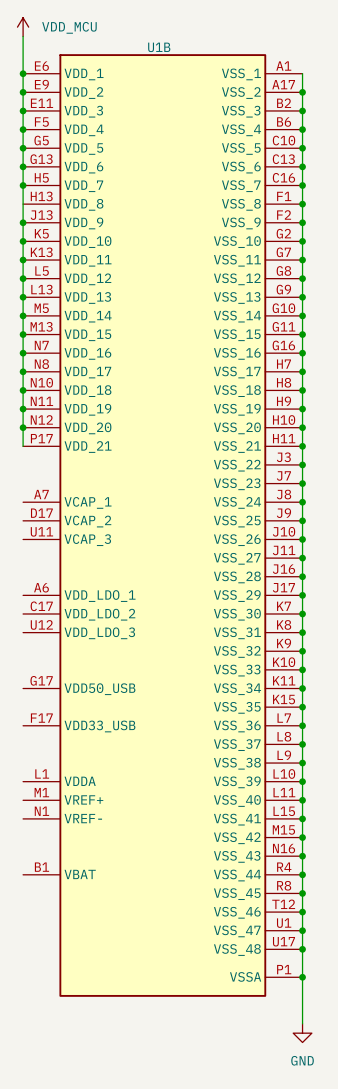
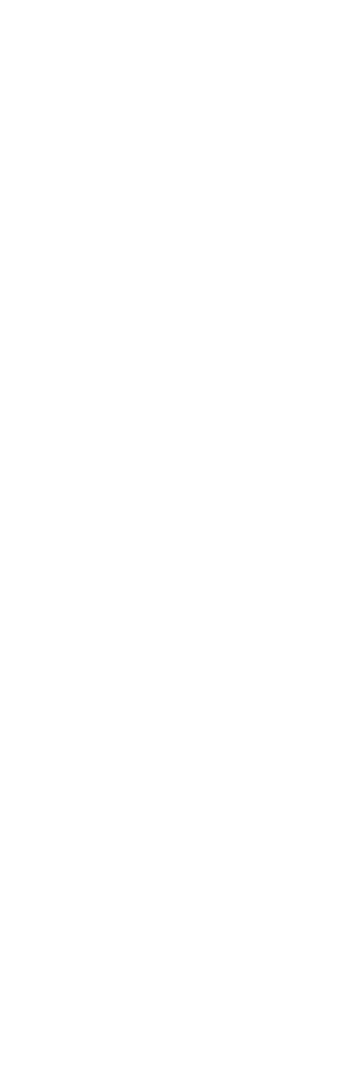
power symbol: VDD_MCU (23, 27) -> none
wire: (23, 36) (23, 446) -> none
junction: (23, 73) -> none
wire: (302, 73) (302, 1023) -> none
junction: (23, 92) -> none
junction: (302, 92) -> none
junction: (23, 110) -> none
junction: (302, 110) -> none
junction: (23, 129) -> none
junction: (302, 129) -> none
junction: (23, 148) -> none
junction: (302, 148) -> none
junction: (23, 166) -> none
junction: (302, 166) -> none
junction: (23, 185) -> none
junction: (302, 185) -> none
junction: (302, 204) -> none
junction: (23, 222) -> none
junction: (302, 222) -> none
junction: (23, 241) -> none
junction: (302, 241) -> none
junction: (23, 260) -> none
junction: (302, 260) -> none
junction: (23, 278) -> none
junction: (302, 278) -> none
junction: (23, 297) -> none
junction: (302, 297) -> none
junction: (23, 315) -> none
junction: (302, 315) -> none
junction: (23, 334) -> none
junction: (302, 334) -> none
junction: (23, 353) -> none
junction: (302, 353) -> none
junction: (23, 371) -> none
junction: (302, 371) -> none
junction: (23, 390) -> none
junction: (302, 390) -> none
junction: (23, 409) -> none
junction: (302, 409) -> none
junction: (23, 427) -> none
junction: (302, 427) -> none
junction: (302, 446) -> none
junction: (302, 464) -> none
junction: (302, 483) -> none
junction: (302, 502) -> none
junction: (302, 520) -> none
U1B: (162, 525) -> none
junction: (302, 539) -> none
junction: (302, 558) -> none
junction: (302, 576) -> none
junction: (302, 595) -> none
junction: (302, 613) -> none
junction: (302, 632) -> none
junction: (302, 651) -> none
junction: (302, 669) -> none
junction: (302, 688) -> none
junction: (302, 707) -> none
junction: (302, 725) -> none
junction: (302, 744) -> none
junction: (302, 763) -> none
junction: (302, 781) -> none
junction: (302, 800) -> none
junction: (302, 818) -> none
junction: (302, 837) -> none
junction: (302, 856) -> none
junction: (302, 874) -> none
junction: (302, 893) -> none
junction: (302, 912) -> none
junction: (302, 930) -> none
junction: (302, 949) -> none
junction: (302, 977) -> none
power symbol: GND (302, 1033) -> none

